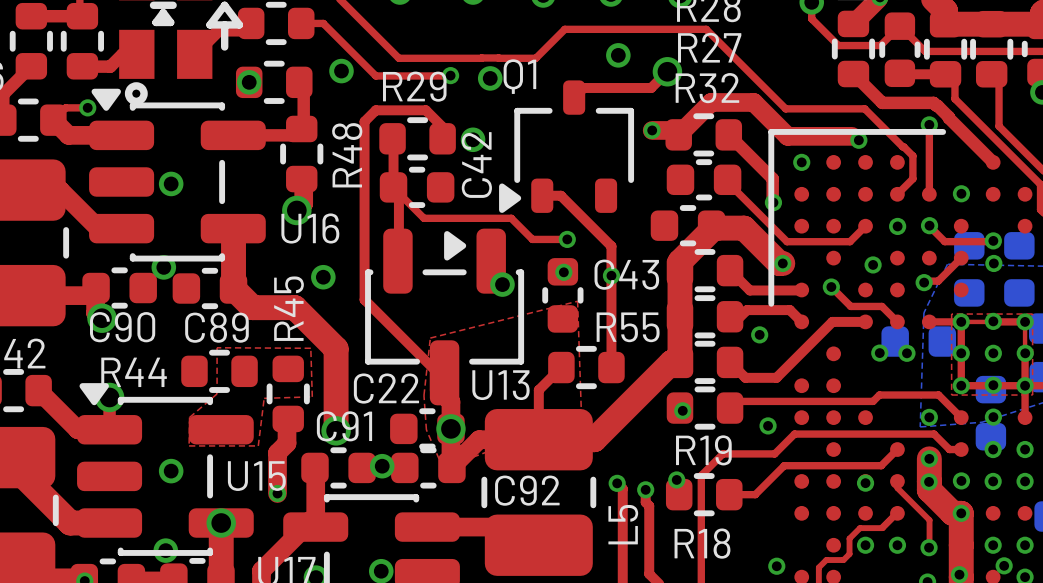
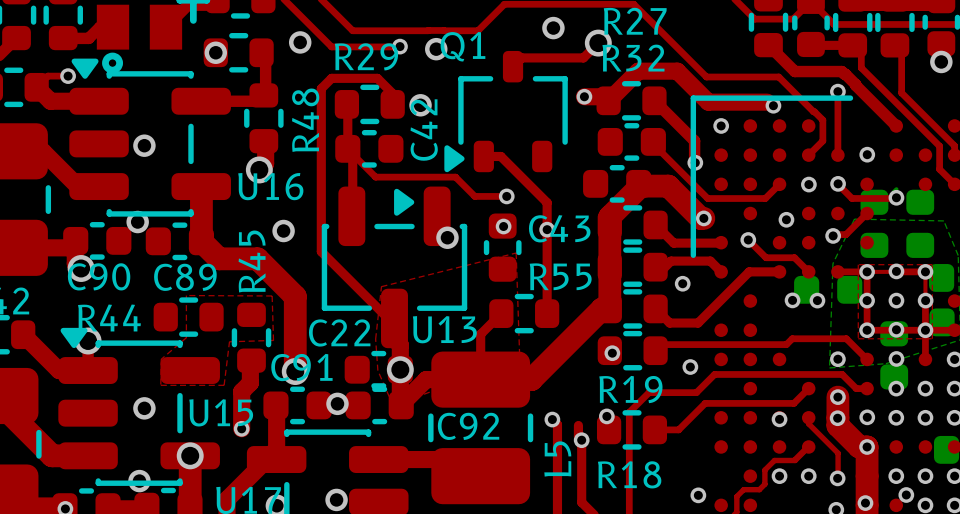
bottom track: none -> (896, 189) (893, 191)
via: (993, 263) -> none
via position: (645, 489) -> (581, 440)

